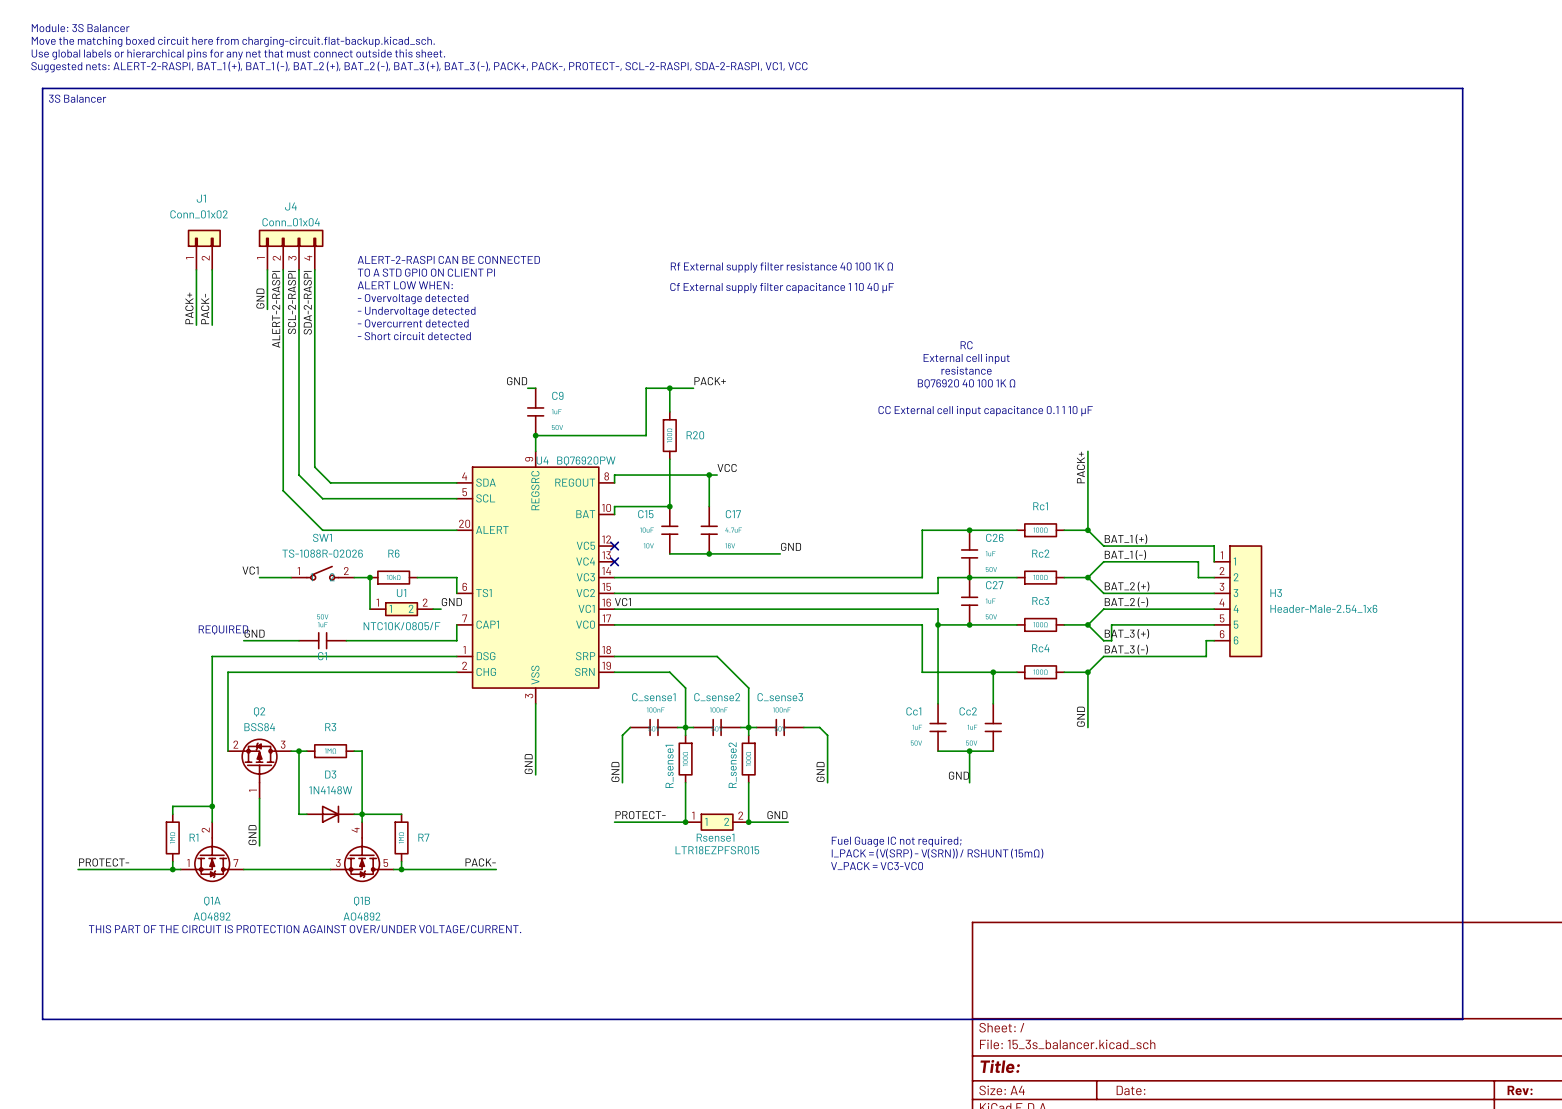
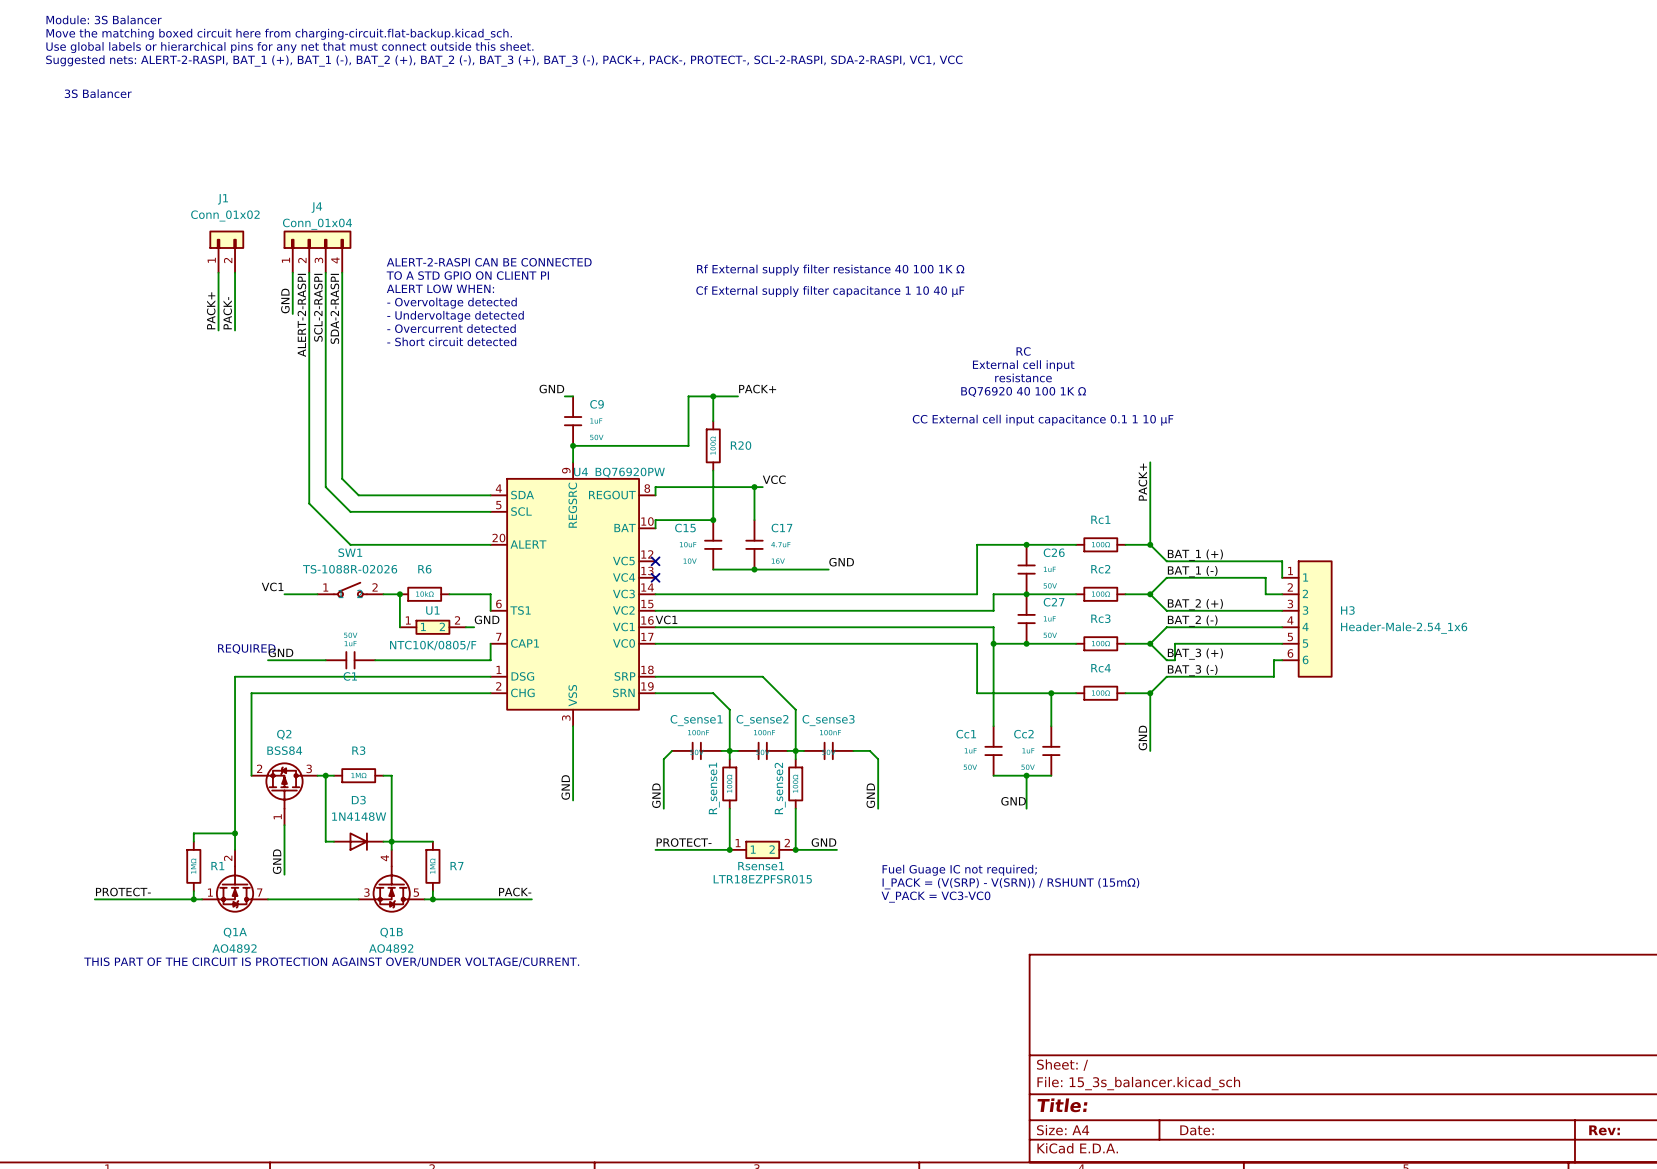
line: (42, 88) (1462, 88) (1462, 1019) (42, 1019) (42, 88) -> none

